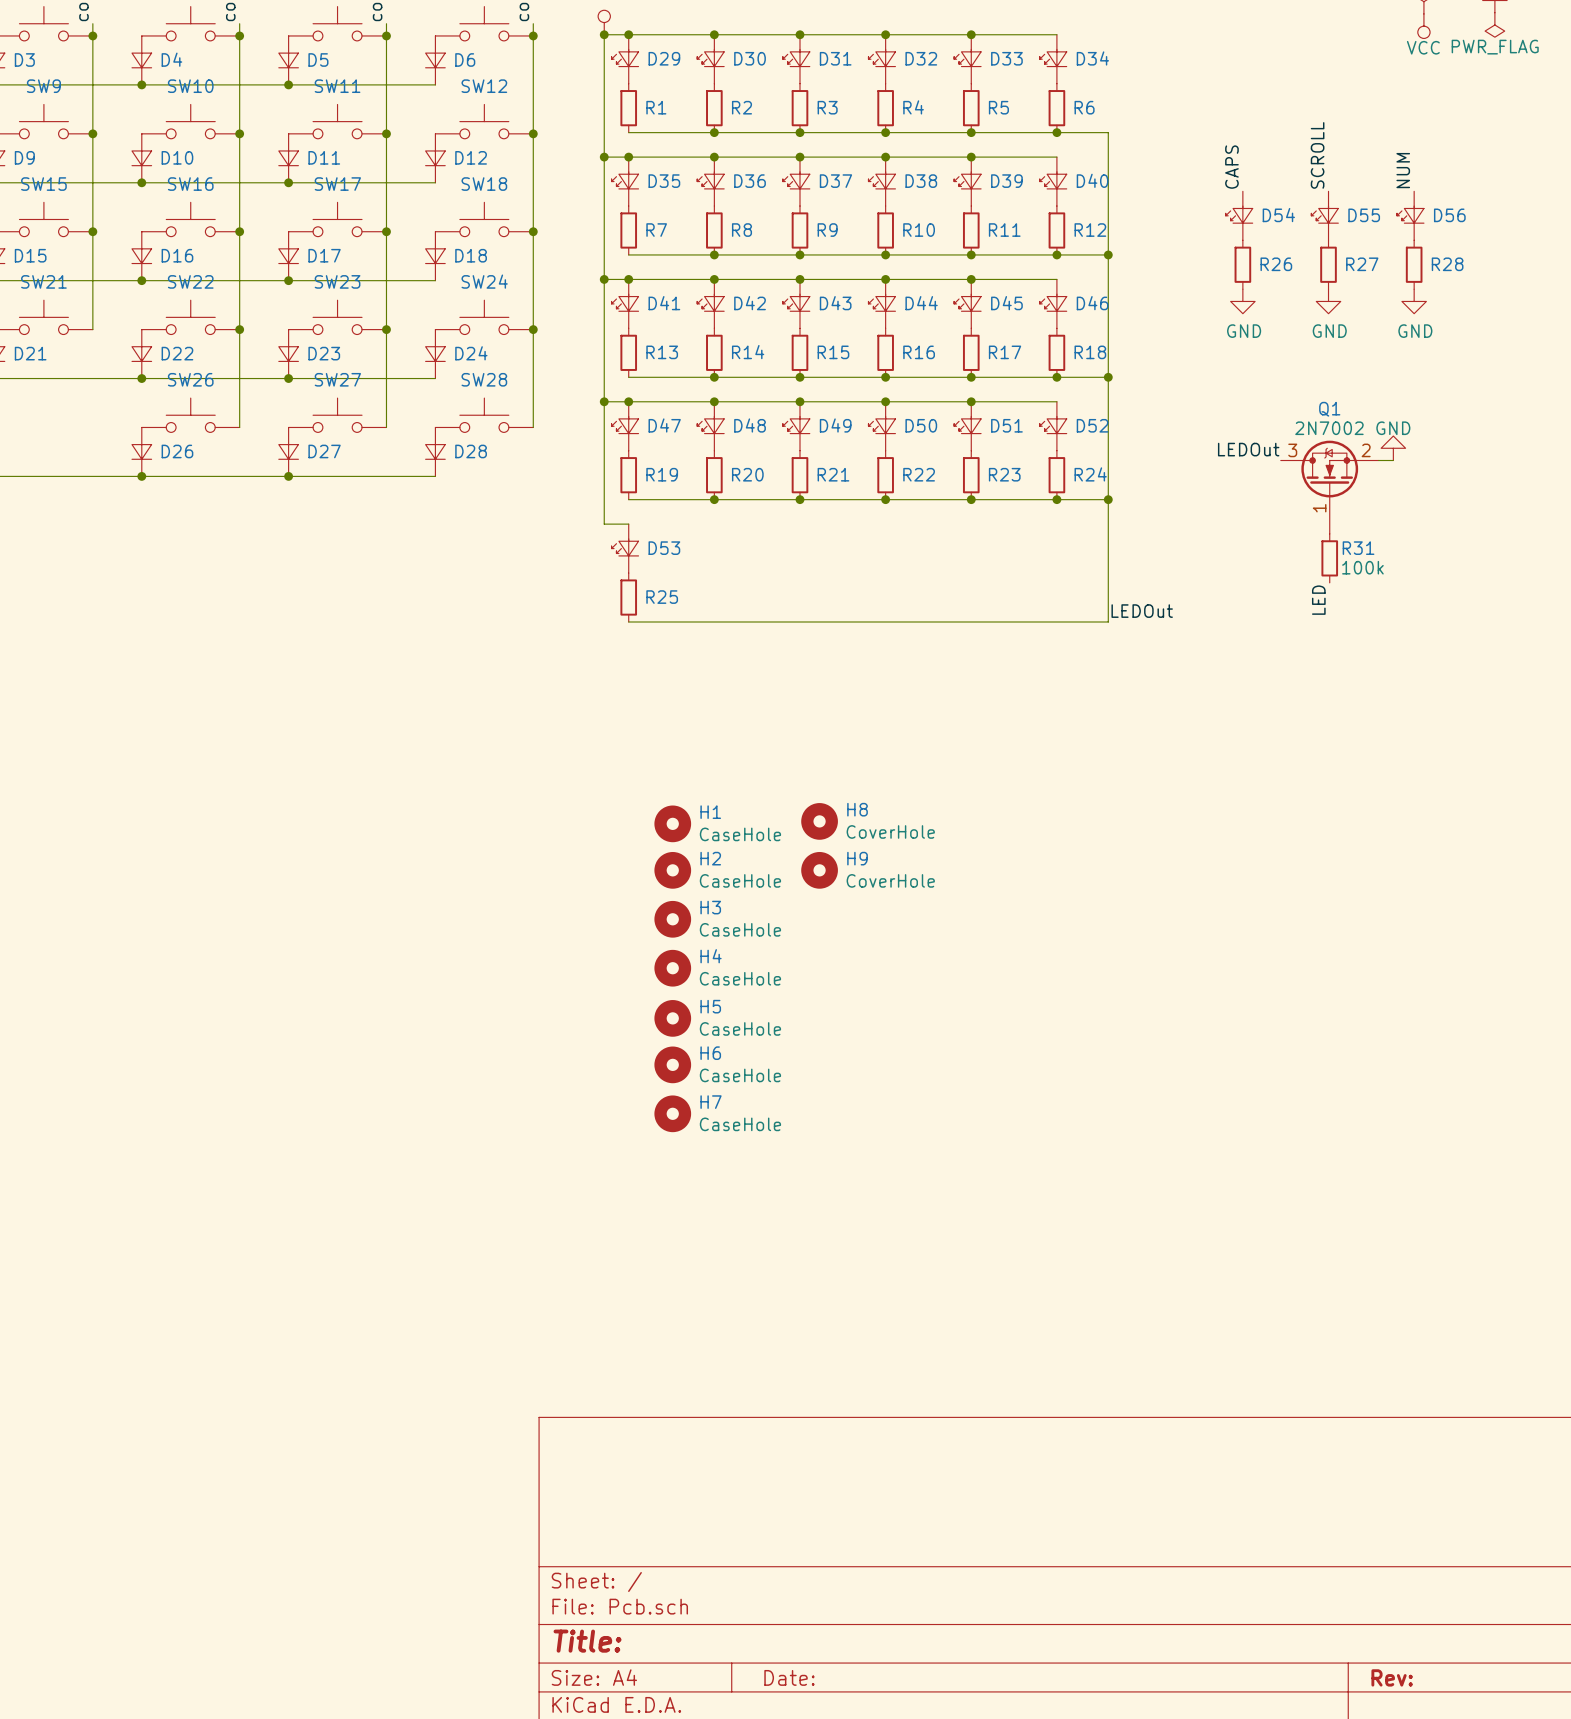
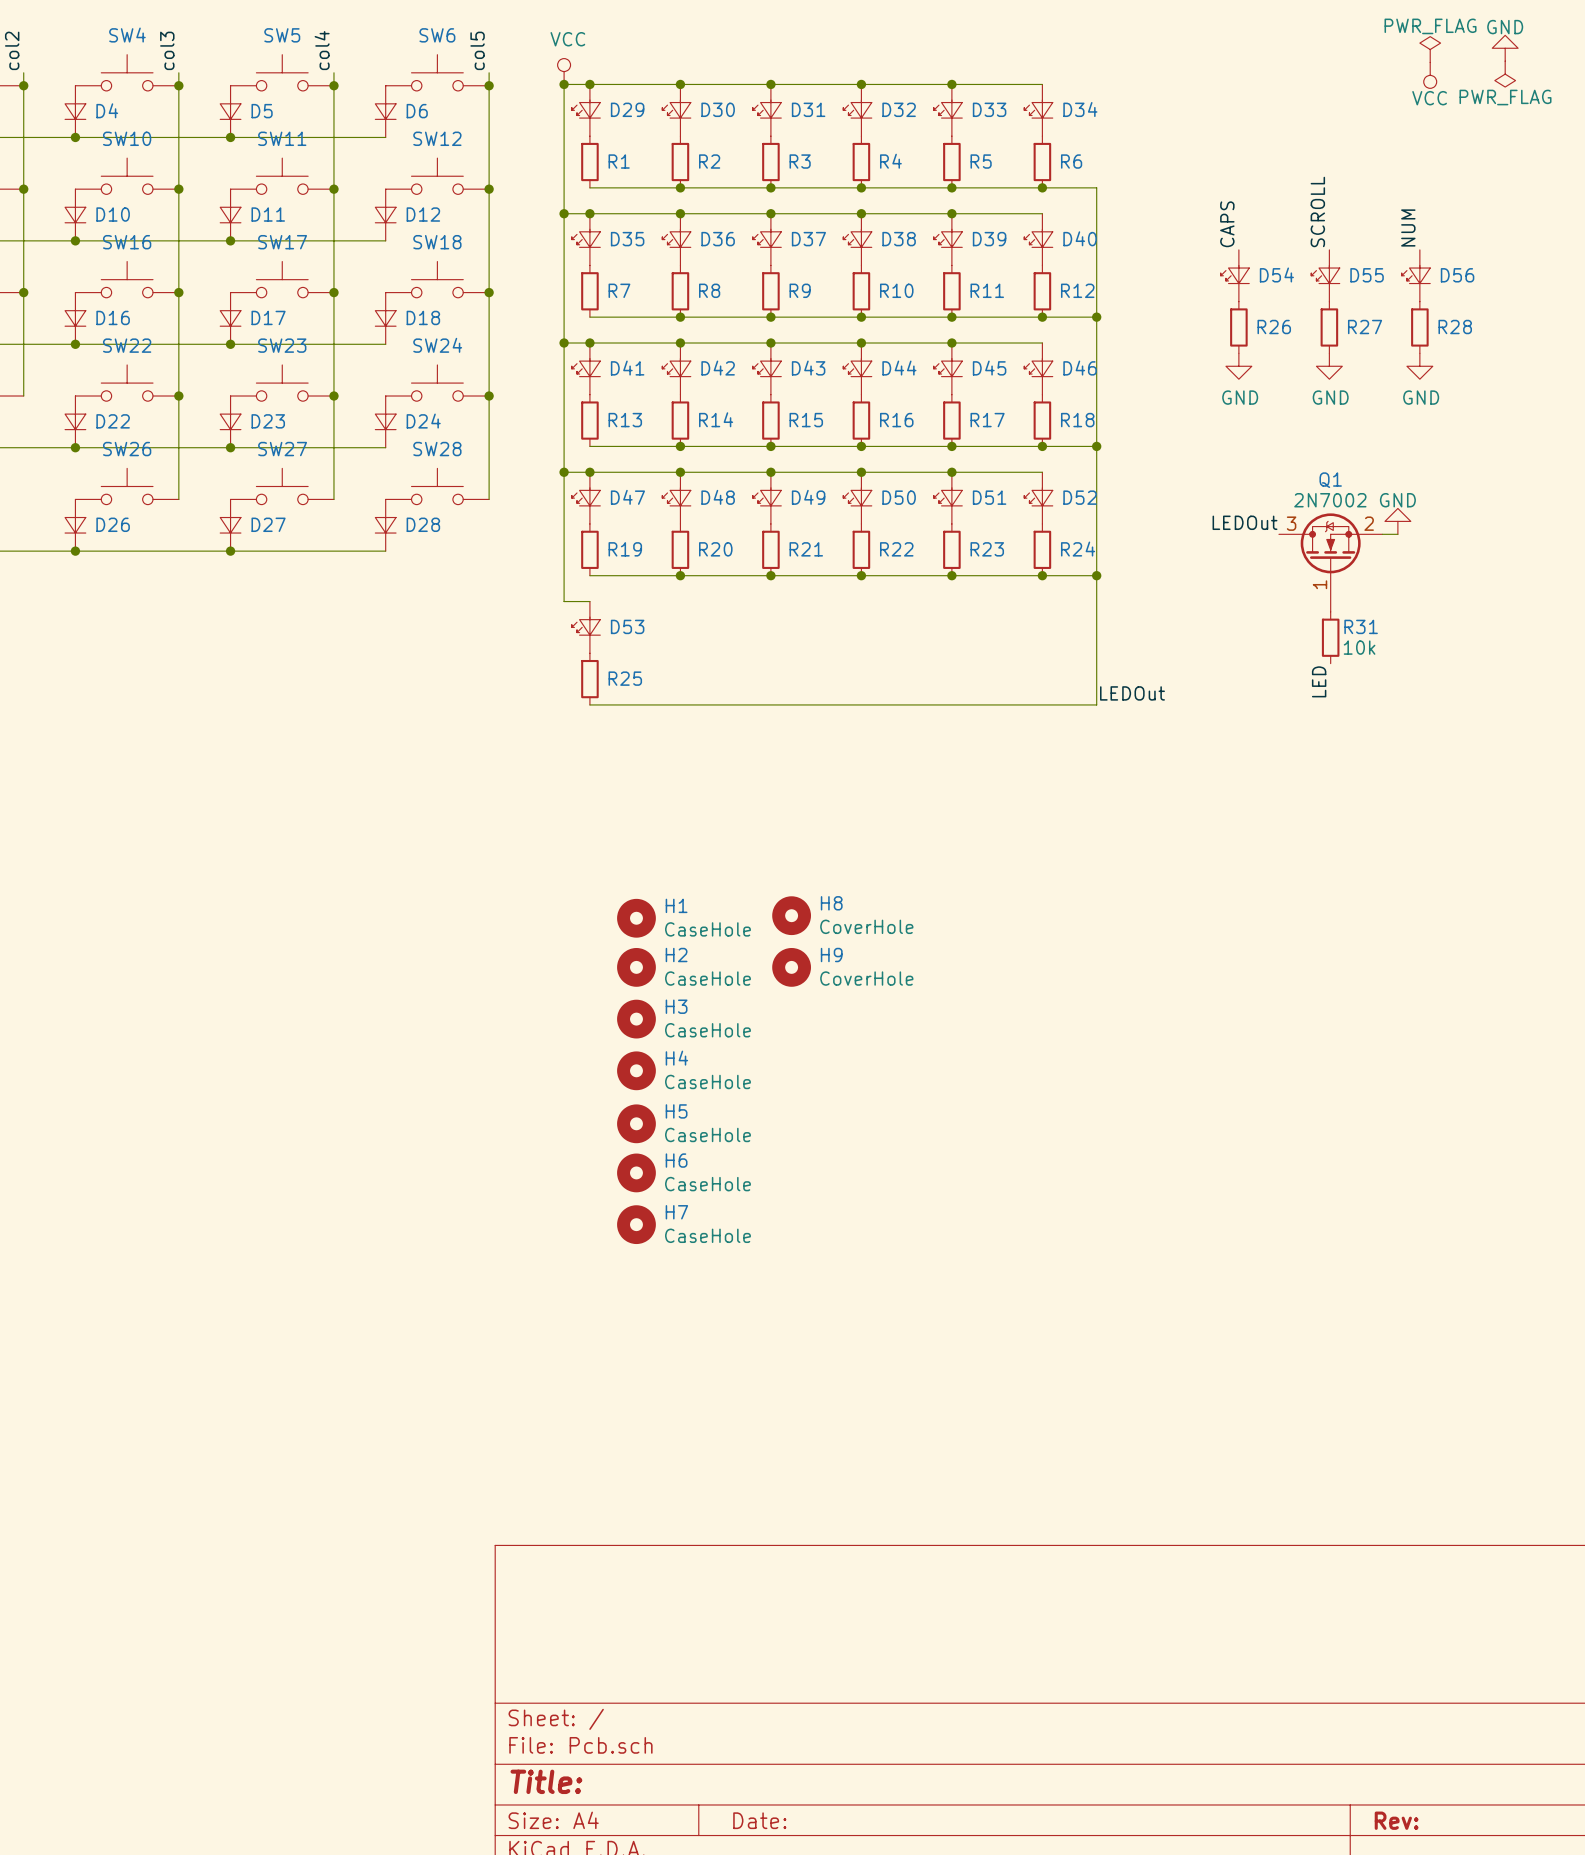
R31 value: 100k (1362, 567) -> 10k (1359, 647)

